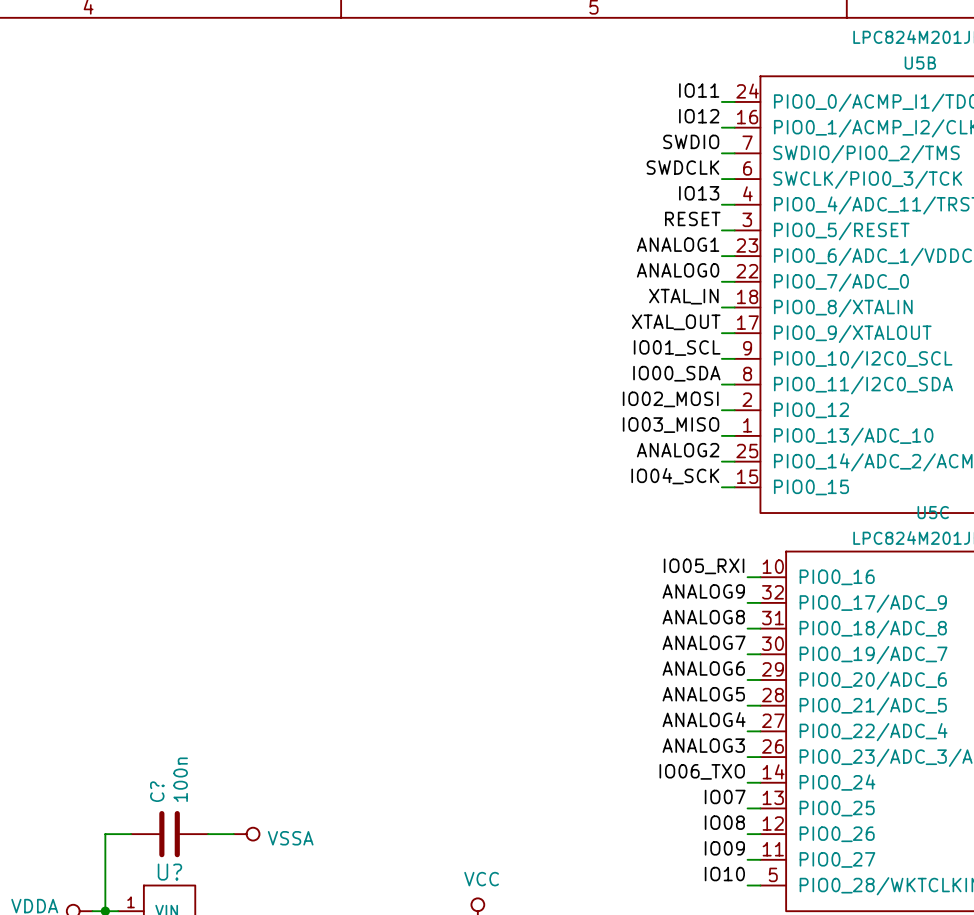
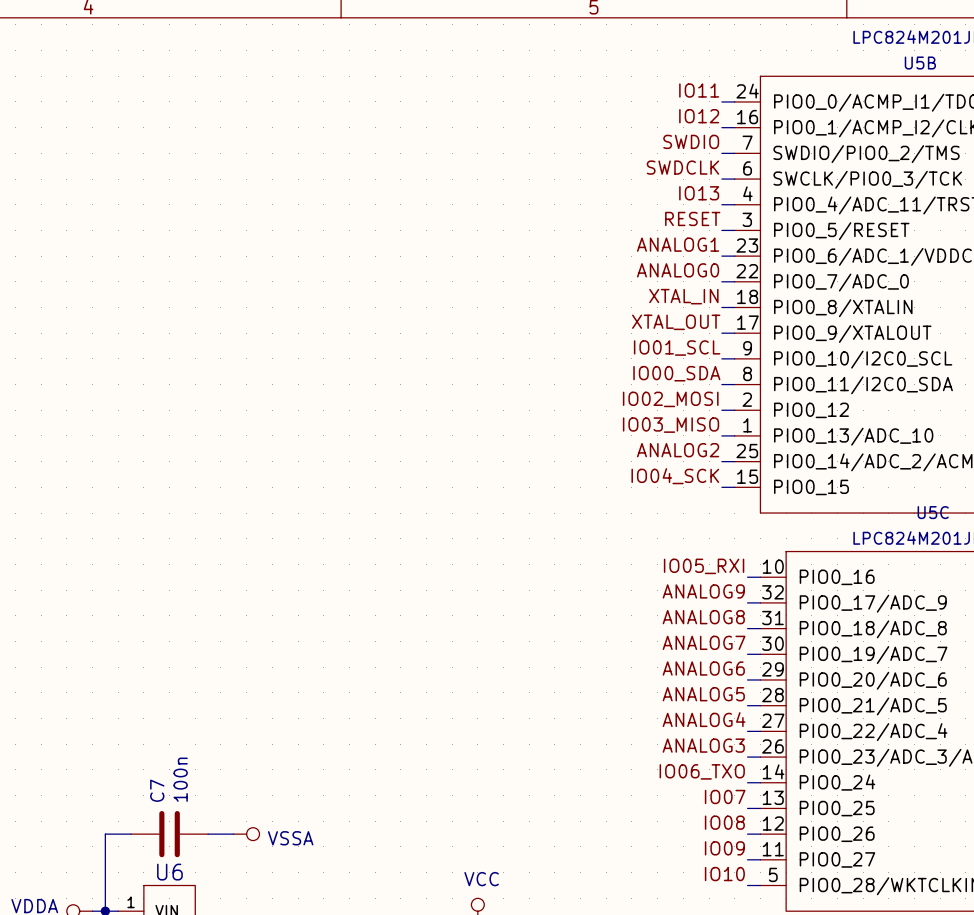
C? name: C? (157, 791) -> C7 (157, 790)
U? name: U? (169, 872) -> U6 (169, 872)

